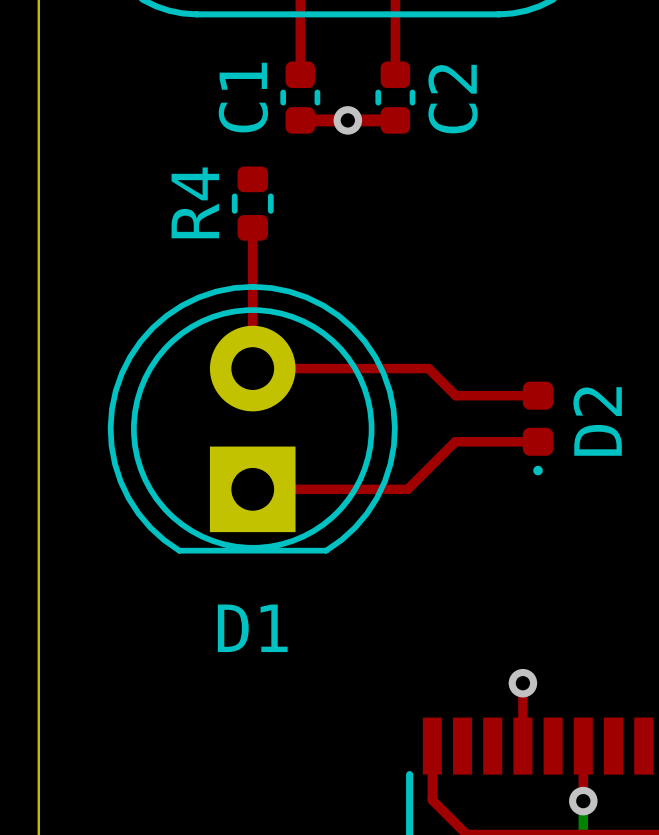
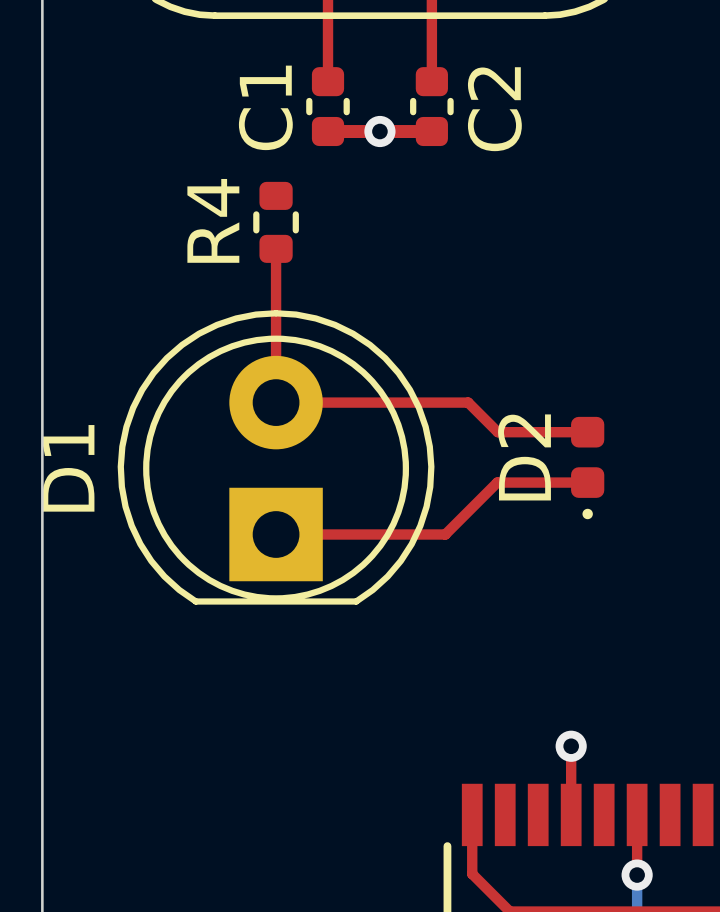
D2 name position: D2 (597, 421) -> D2 (524, 457)
D1 name rotation: 0° (252, 628) -> 90° counterclockwise (68, 468)
D1 name position: D1 (252, 628) -> D1 (68, 468)

